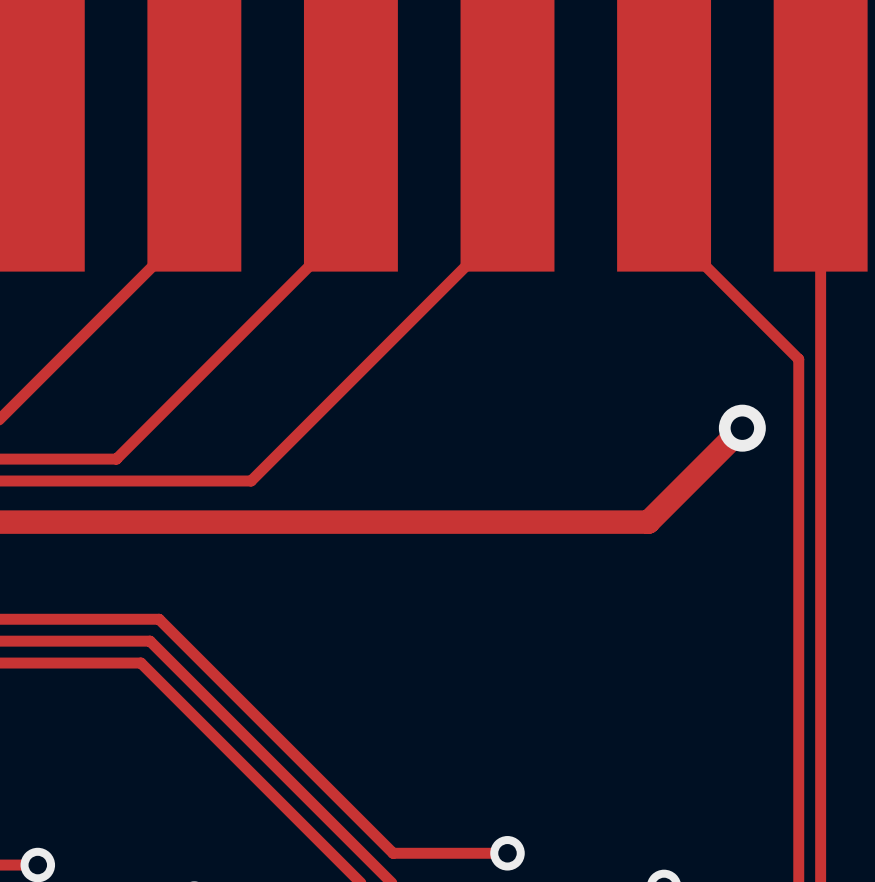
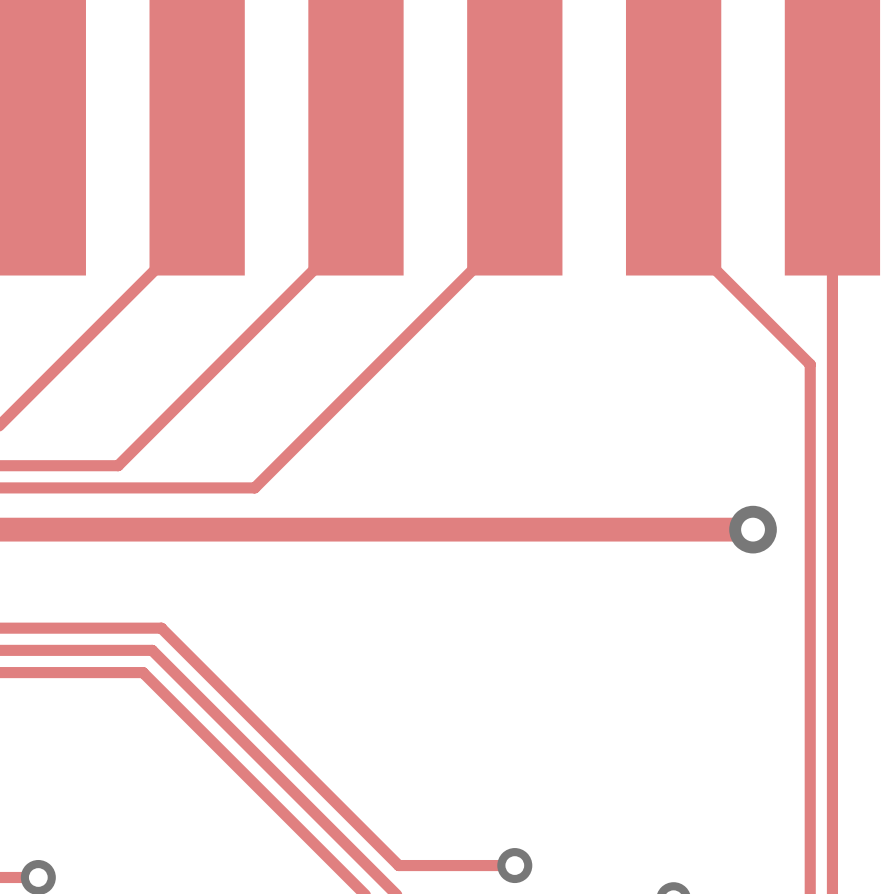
track: (742, 428) (648, 522) -> (753, 529) (657, 529)
via position: (742, 428) -> (753, 529)

